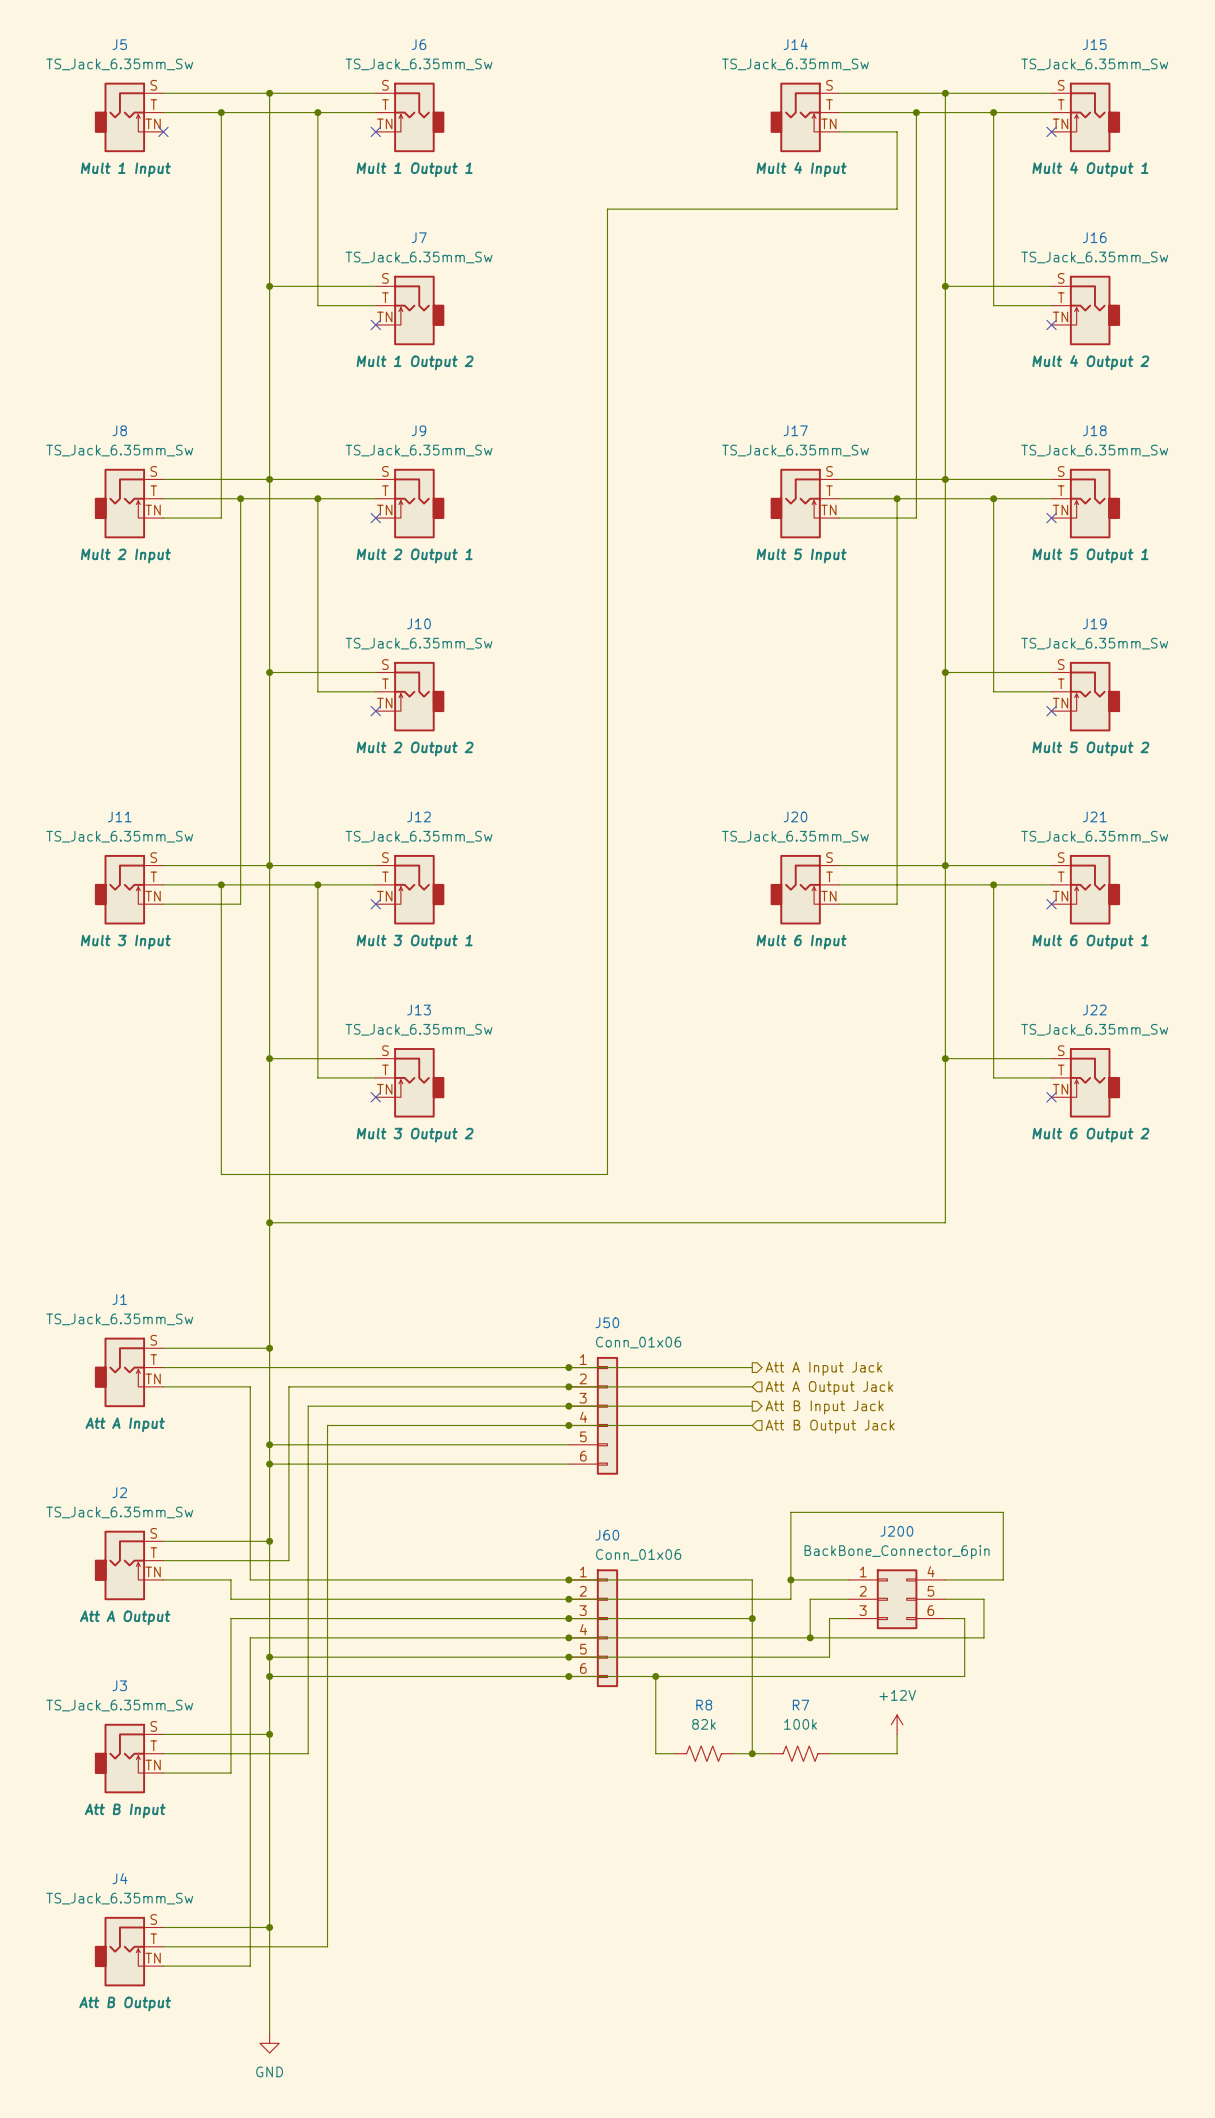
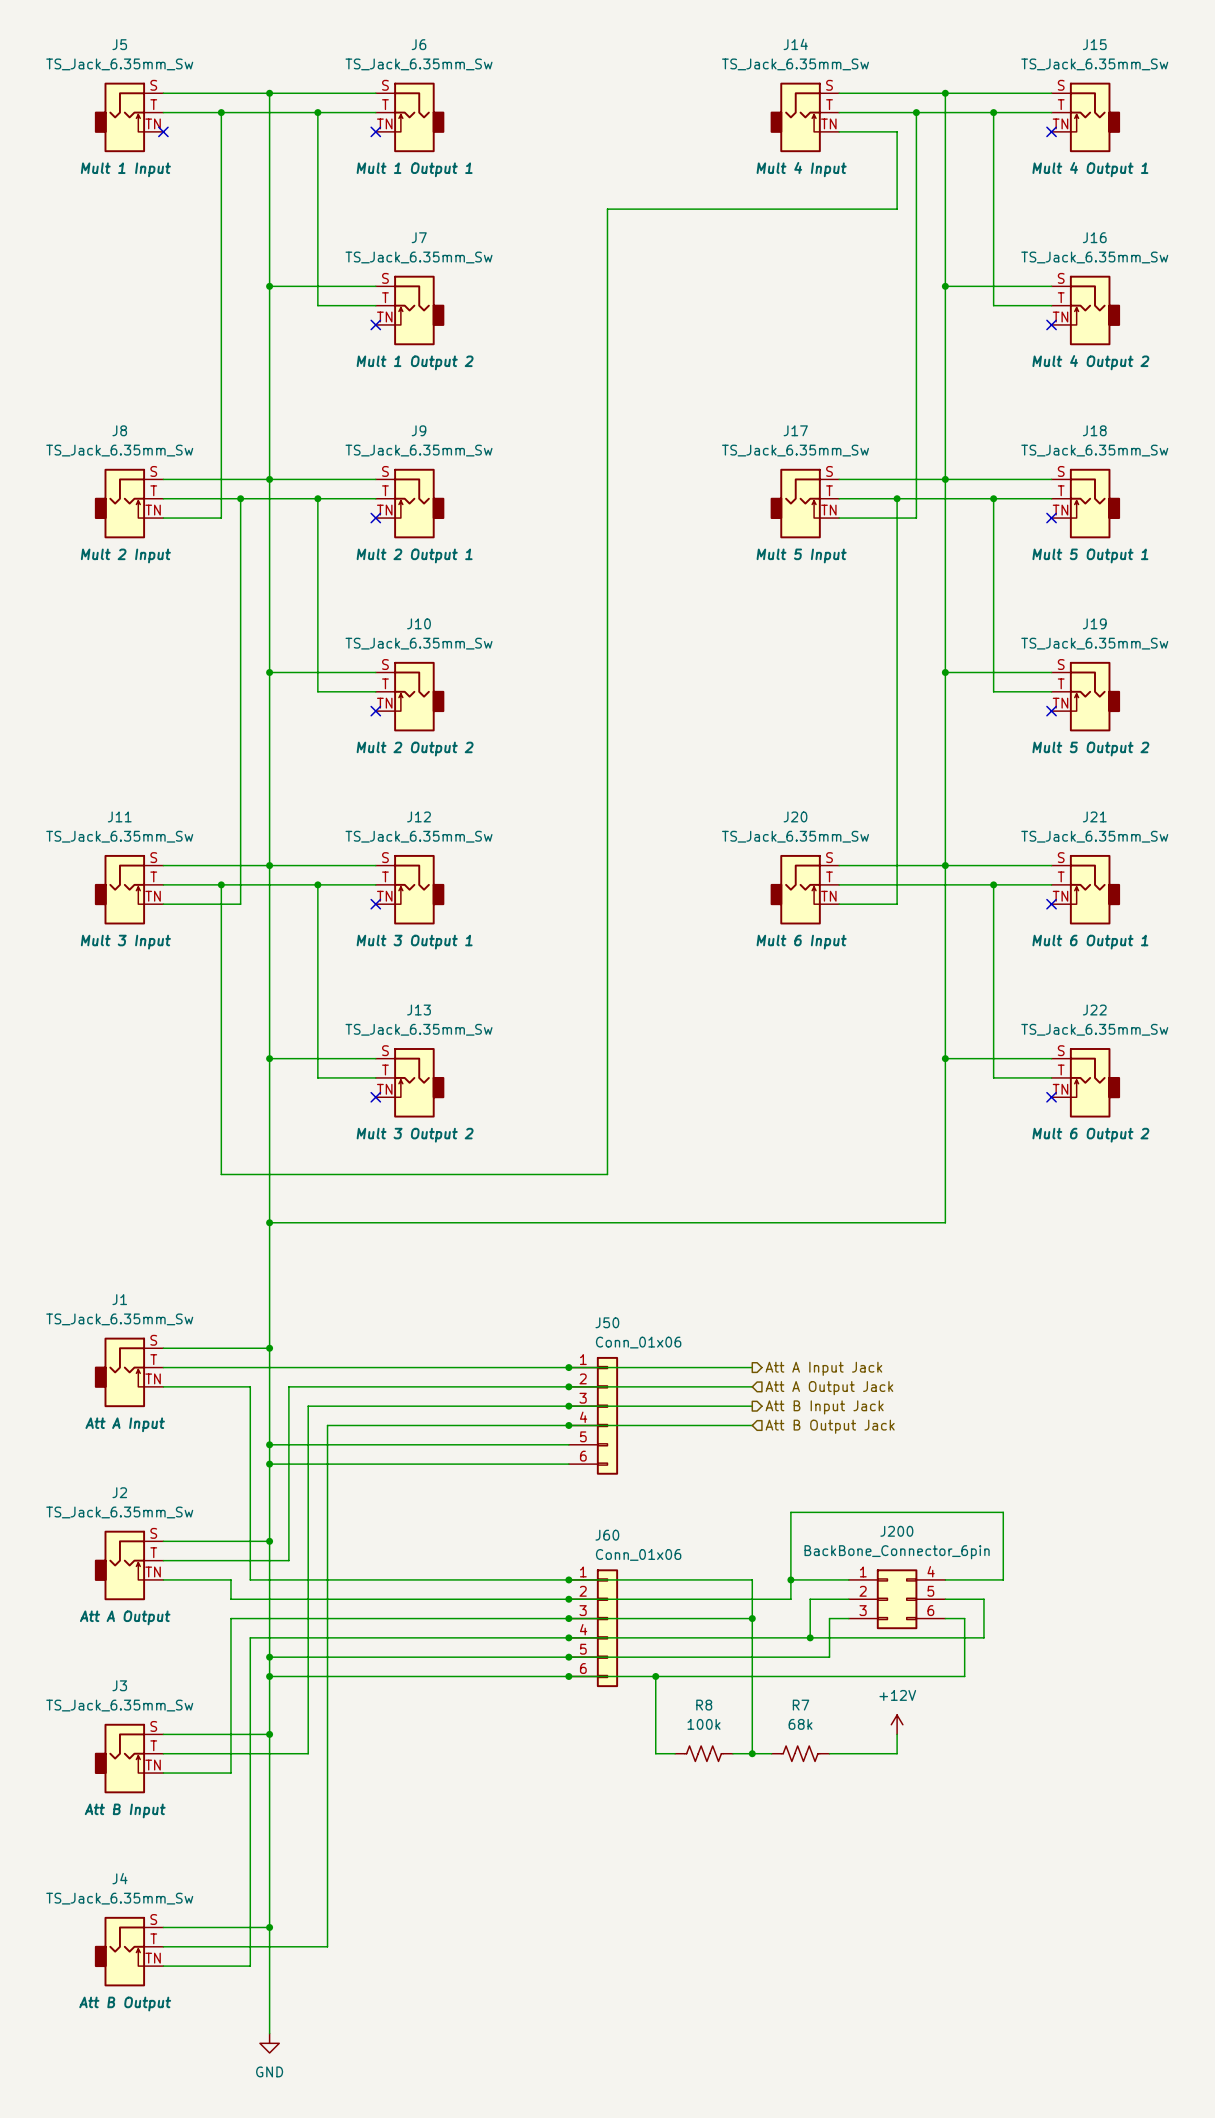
R8 value: 82k (704, 1724) -> 100k (704, 1724)
R7 value: 100k (800, 1724) -> 68k (800, 1724)

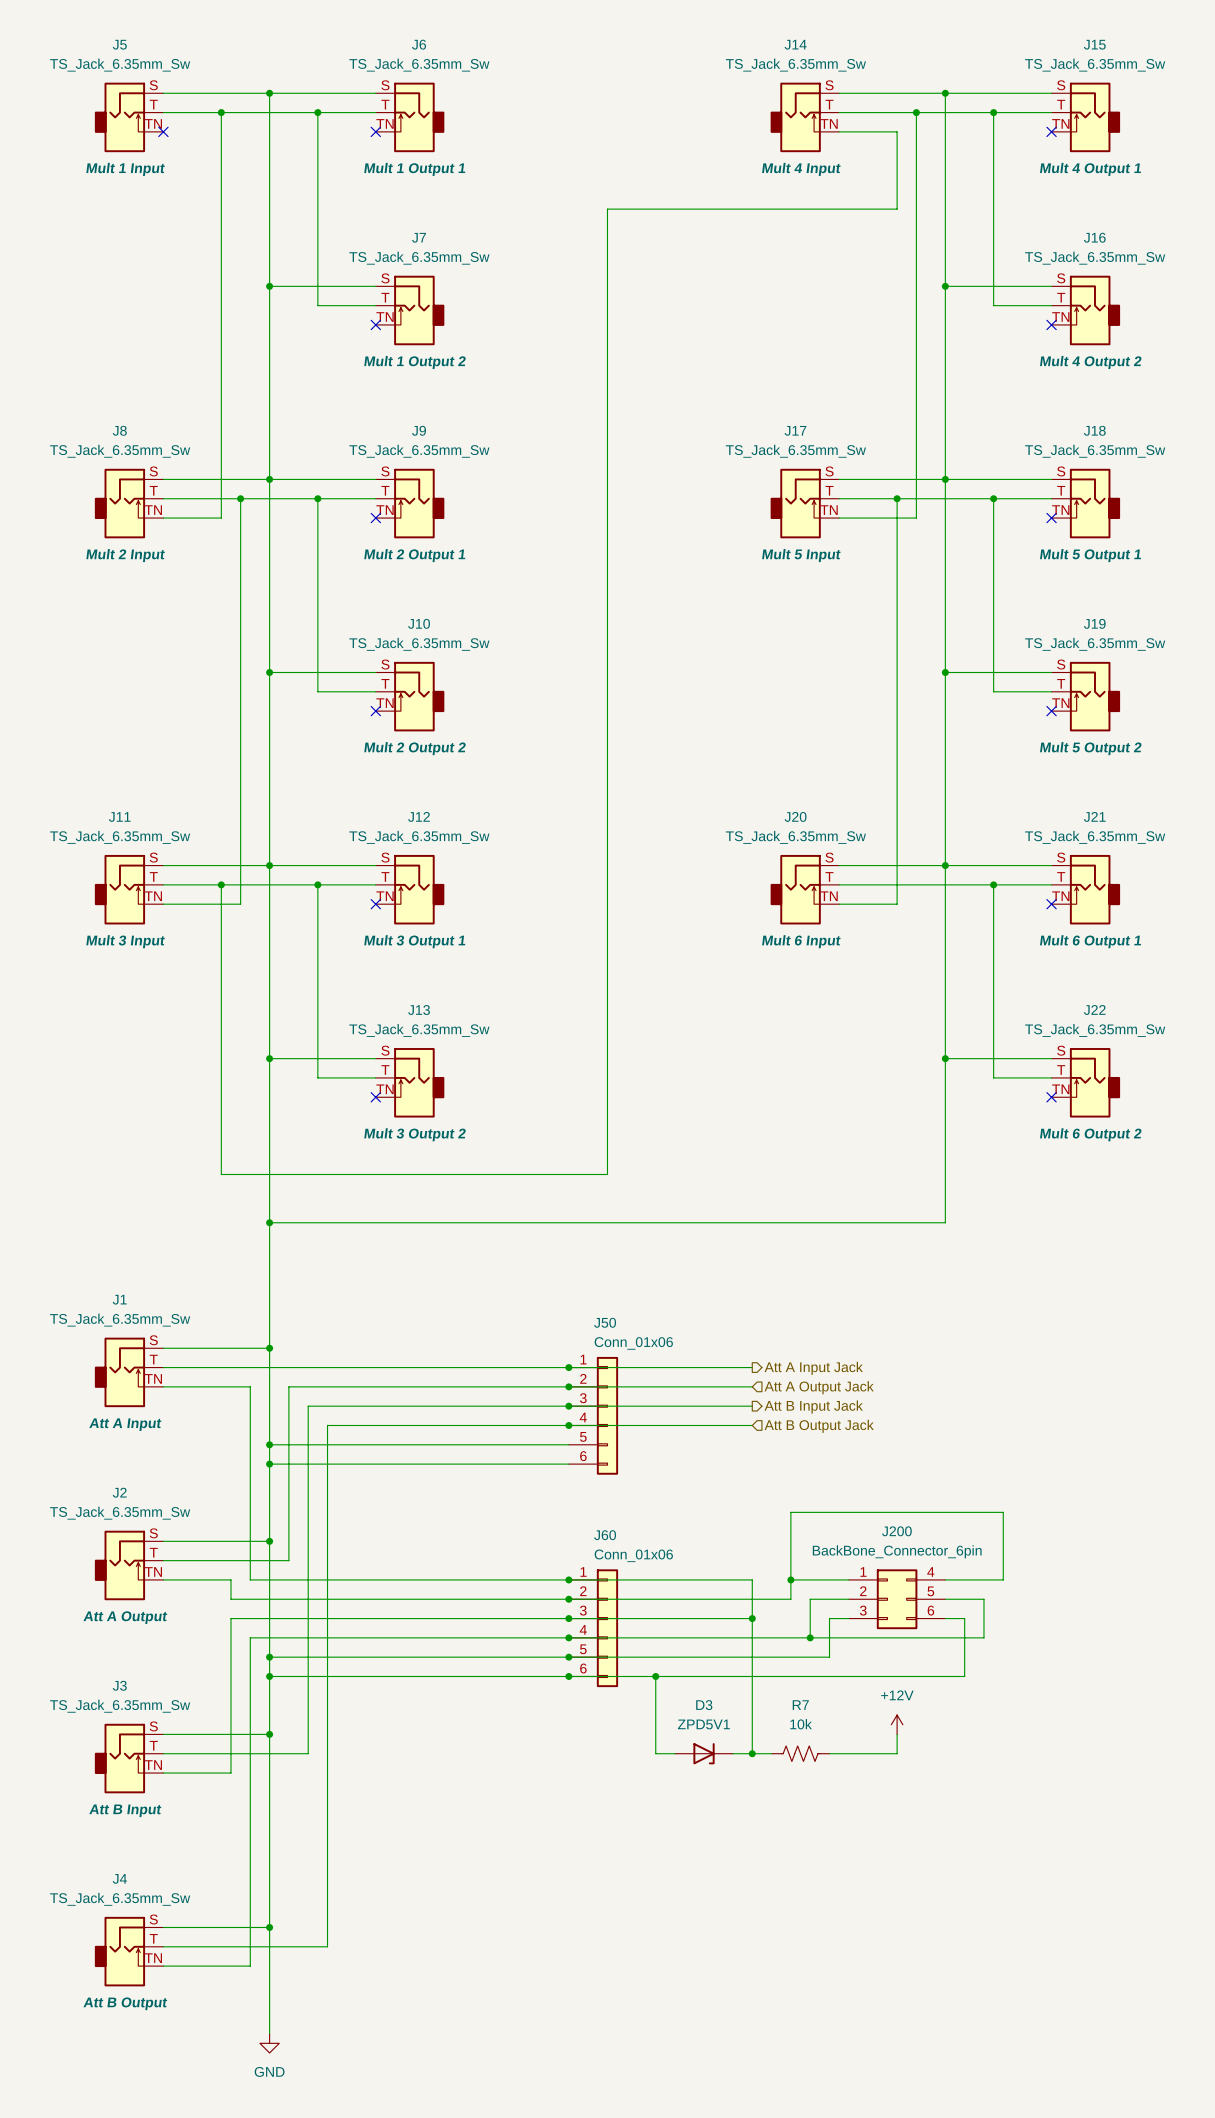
R7 value: 68k (800, 1724) -> 10k (801, 1724)
R8: 100k (704, 1753) -> none
D3: none -> ZPD5V1 (704, 1753)

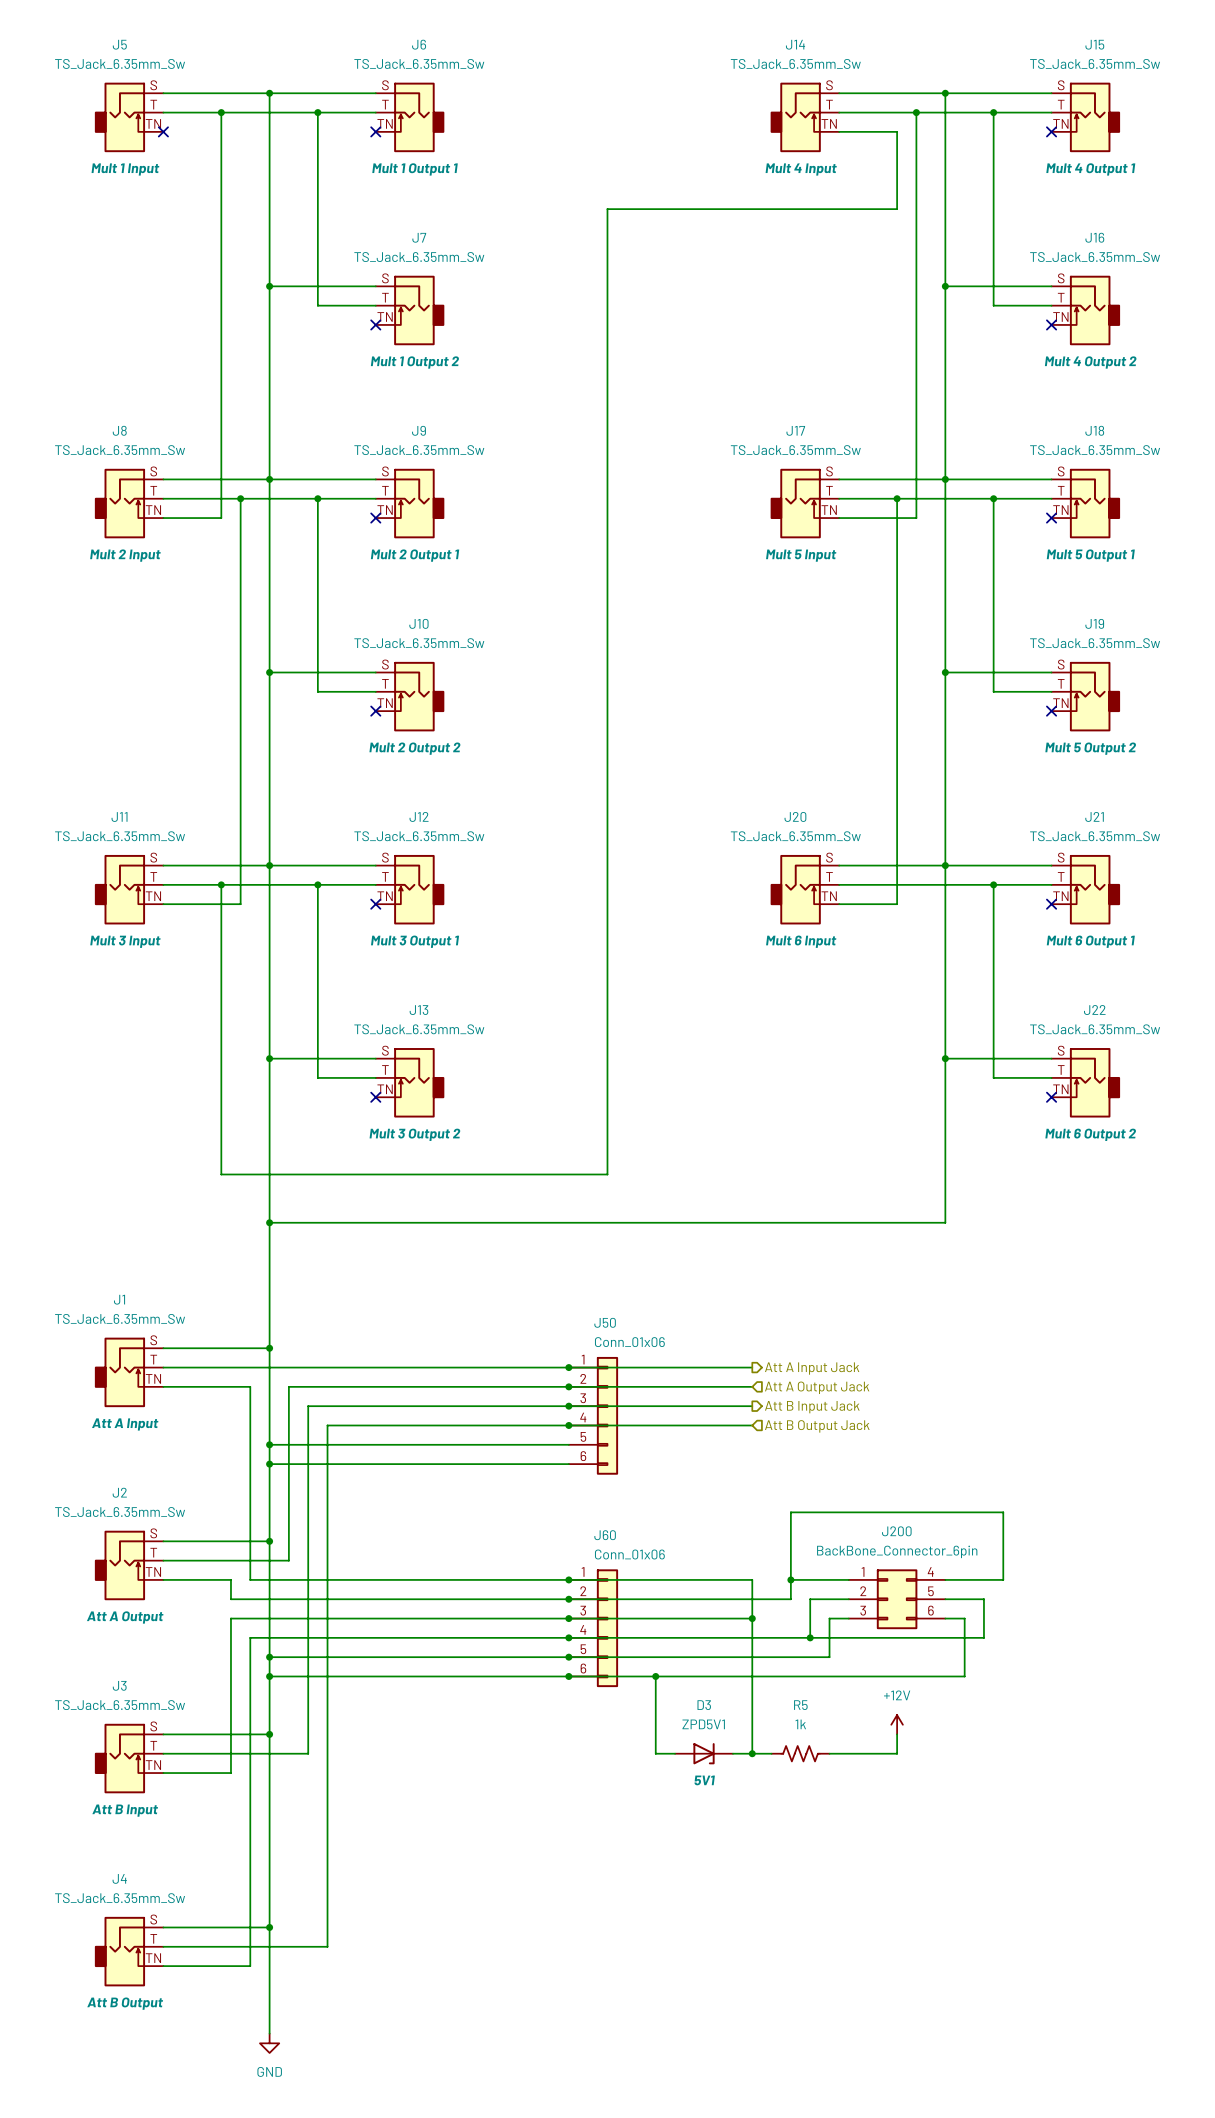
R7 name: R7 (800, 1705) -> R5 (800, 1705)
R7 value: 10k (801, 1724) -> 1k (800, 1724)
D3 text: none -> 5V1 (704, 1780)

